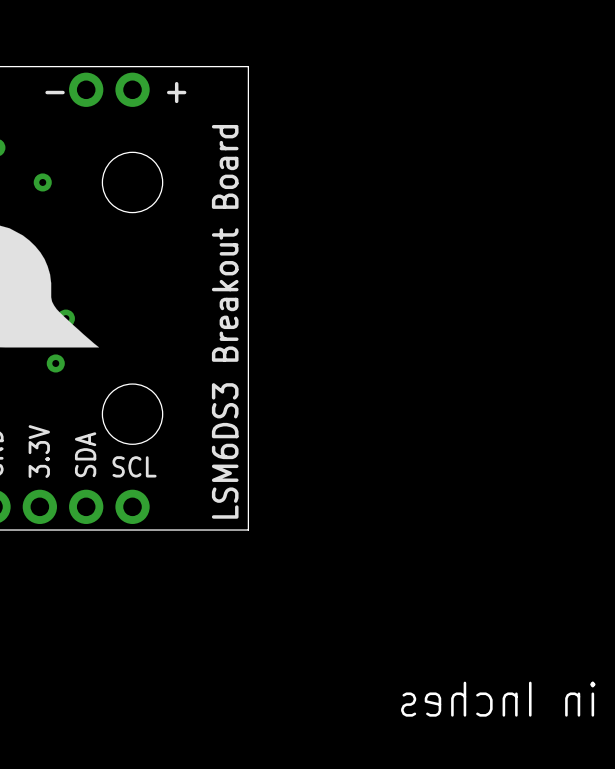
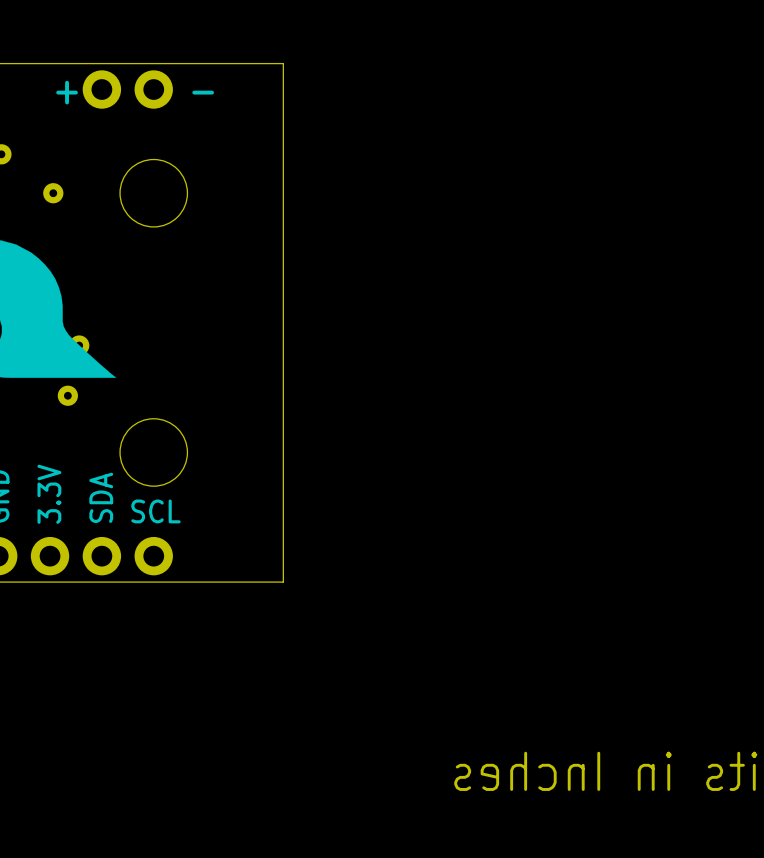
text: - (55, 92) -> + (67, 92)
text: + (176, 92) -> - (203, 92)
text: LSM6DS3 Breakout Board (225, 321) -> none

